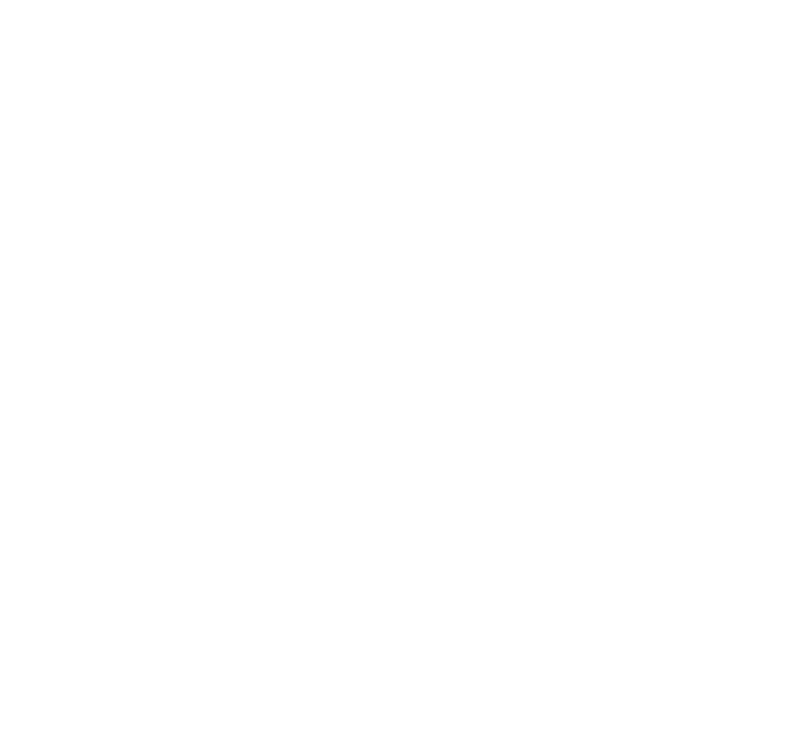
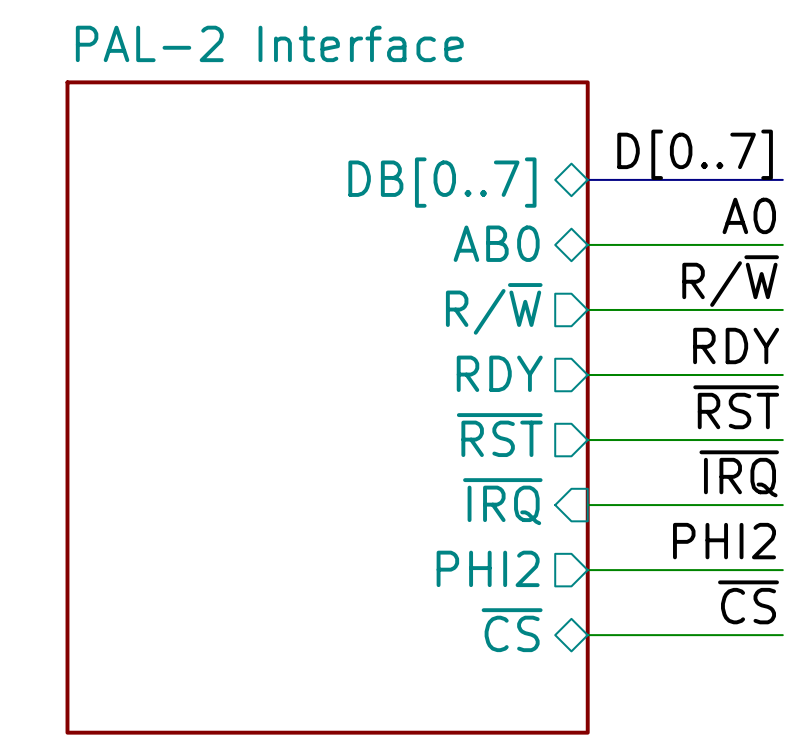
label: none -> D[0..7] (695, 154)
bus: none -> (587, 179) (782, 179)
sheet pin: none -> DB[0..7] (442, 182)
label: none -> A0 (749, 215)
sheet pin: none -> AB0 (496, 243)
wire: none -> (587, 244) (782, 244)
label: none -> R/~{W} (730, 281)
sheet pin: none -> R/~{W} (494, 308)
wire: none -> (587, 309) (782, 309)
label: none -> RDY (736, 345)
sheet pin: none -> RDY (499, 373)
wire: none -> (587, 375) (782, 375)
sheet PAL-2 Interface: none -> (327, 407)
label: none -> ~{RST} (736, 407)
sheet pin: none -> ~{RST} (499, 435)
wire: none -> (587, 440) (782, 440)
label: none -> ~{IRQ} (739, 473)
sheet pin: none -> ~{IRQ} (502, 501)
wire: none -> (587, 505) (782, 505)
label: none -> PHI2 (724, 541)
sheet pin: none -> PHI2 (488, 568)
wire: none -> (587, 570) (782, 570)
label: none -> ~{CS} (748, 602)
sheet pin: none -> ~{CS} (512, 630)
wire: none -> (587, 635) (782, 635)

